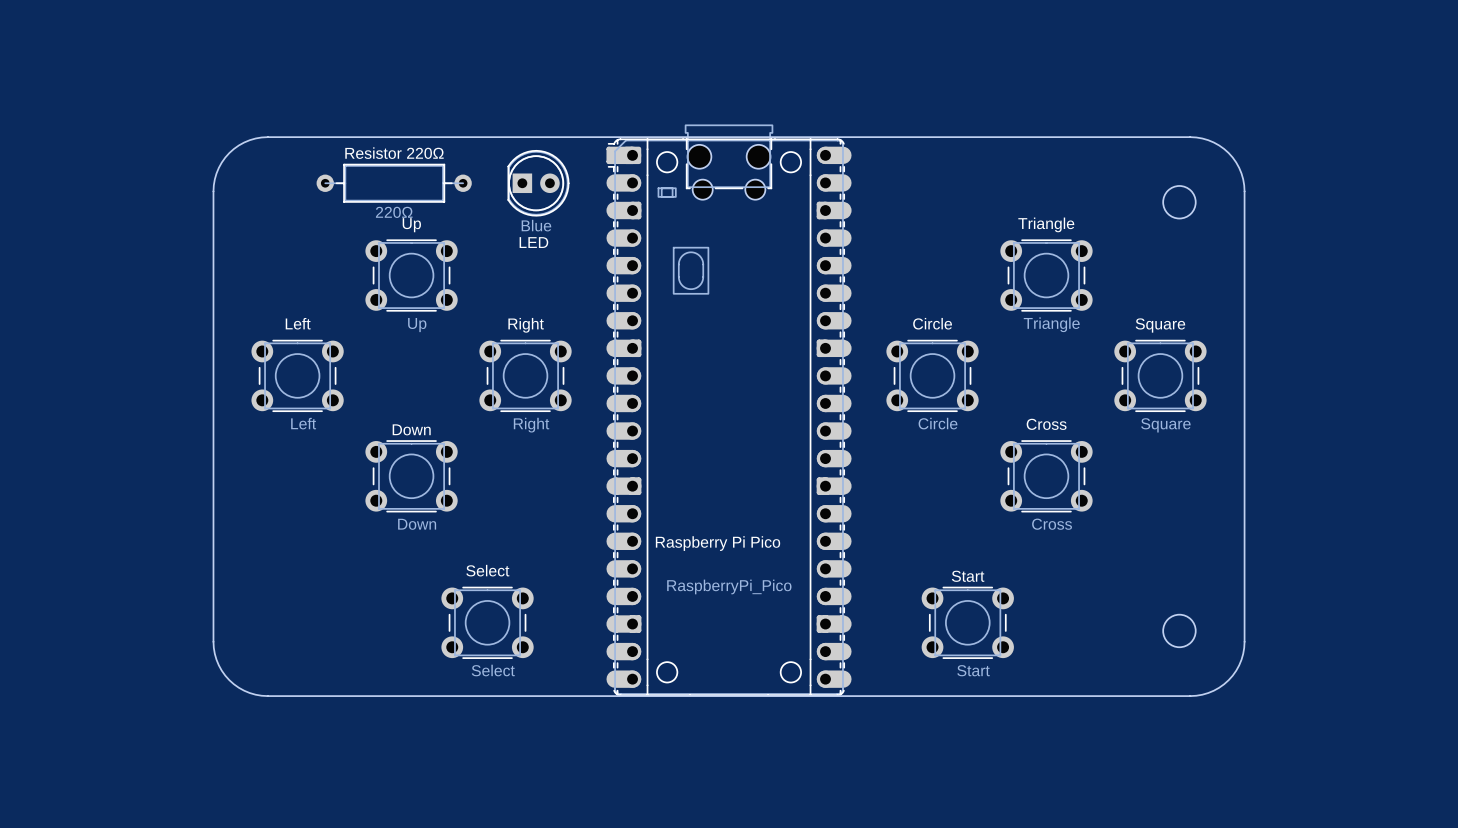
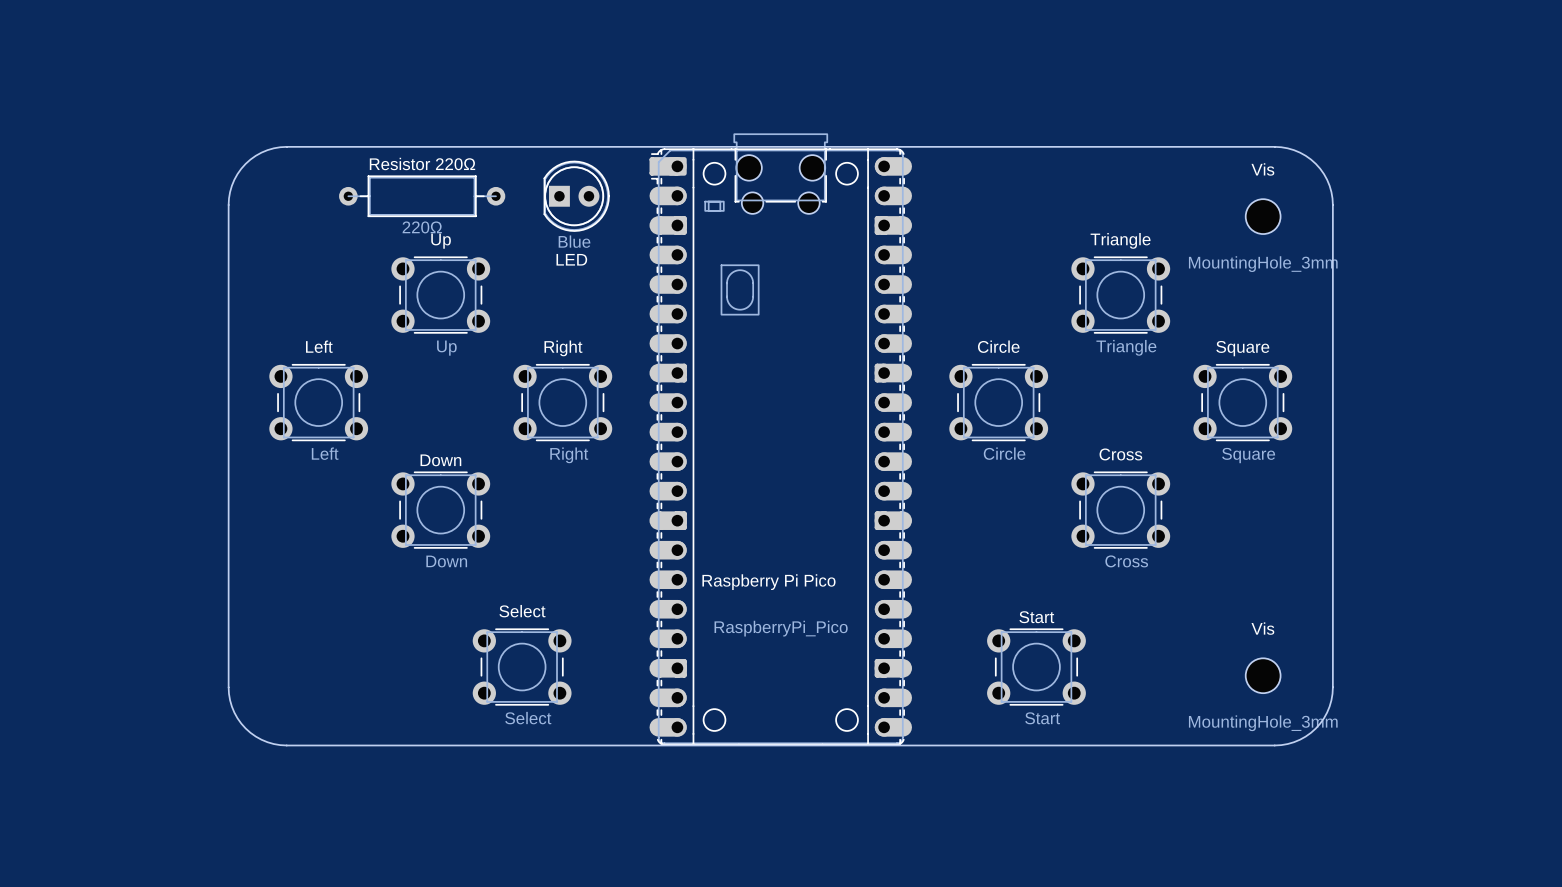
round board edge: [1162, 185, 1196, 219] -> none
Vis: none -> MountingHole_3mm (1263, 216)
round board edge: [1162, 614, 1196, 648] -> none
Vis: none -> MountingHole_3mm (1263, 675)

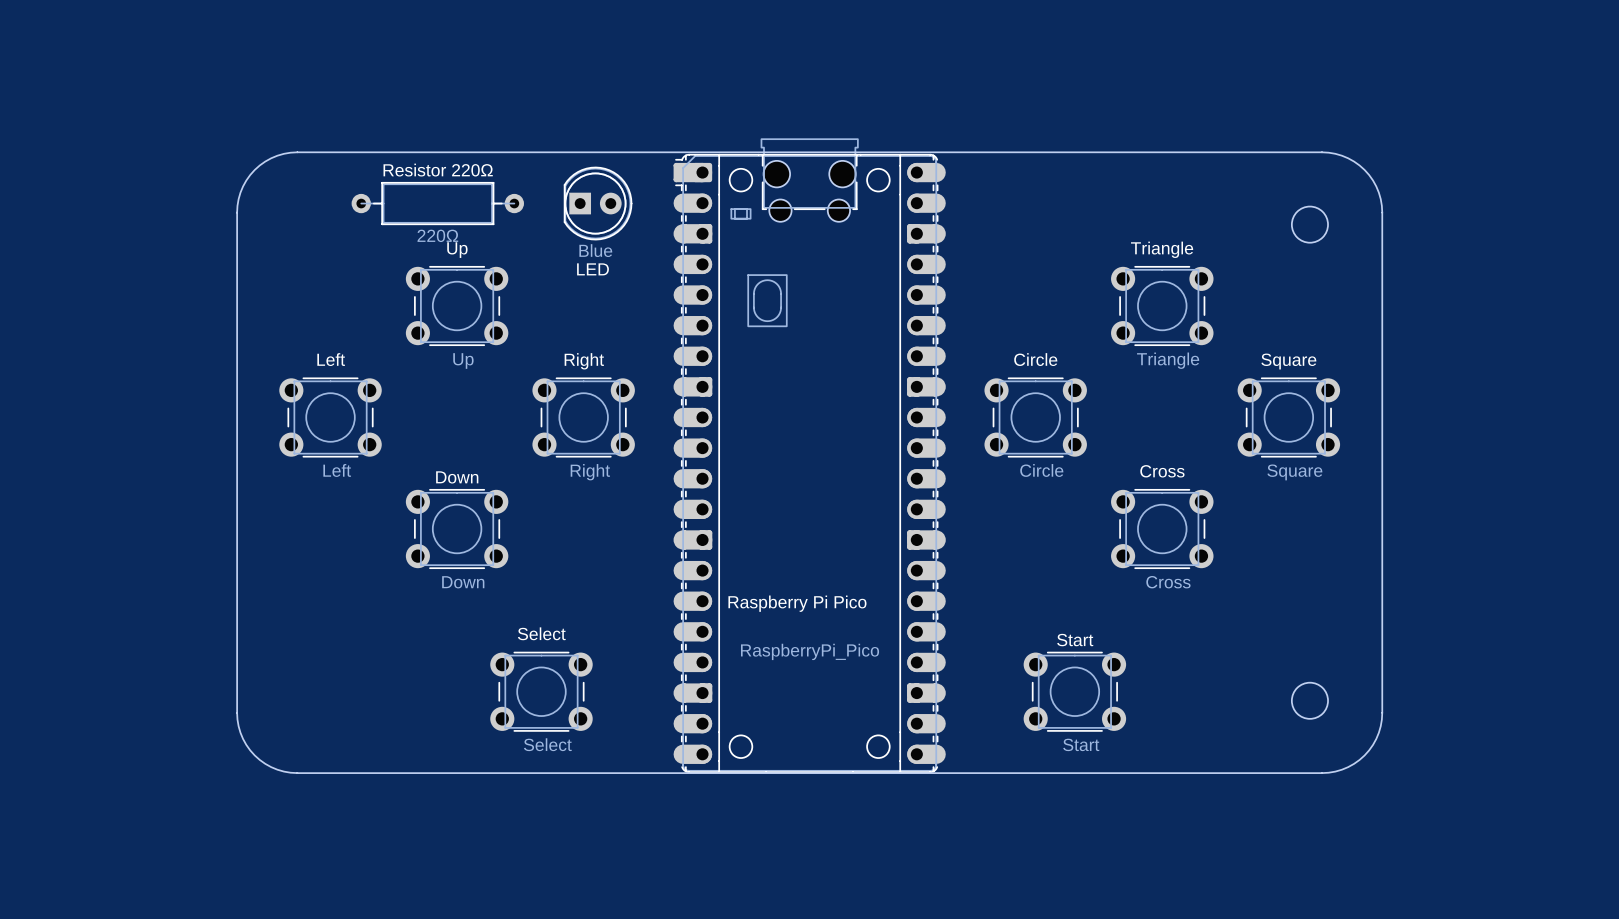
round board edge: none -> [1291, 206, 1329, 244]
Vis: MountingHole_3mm (1263, 216) -> none
round board edge: none -> [1291, 682, 1329, 720]
Vis: MountingHole_3mm (1263, 675) -> none

